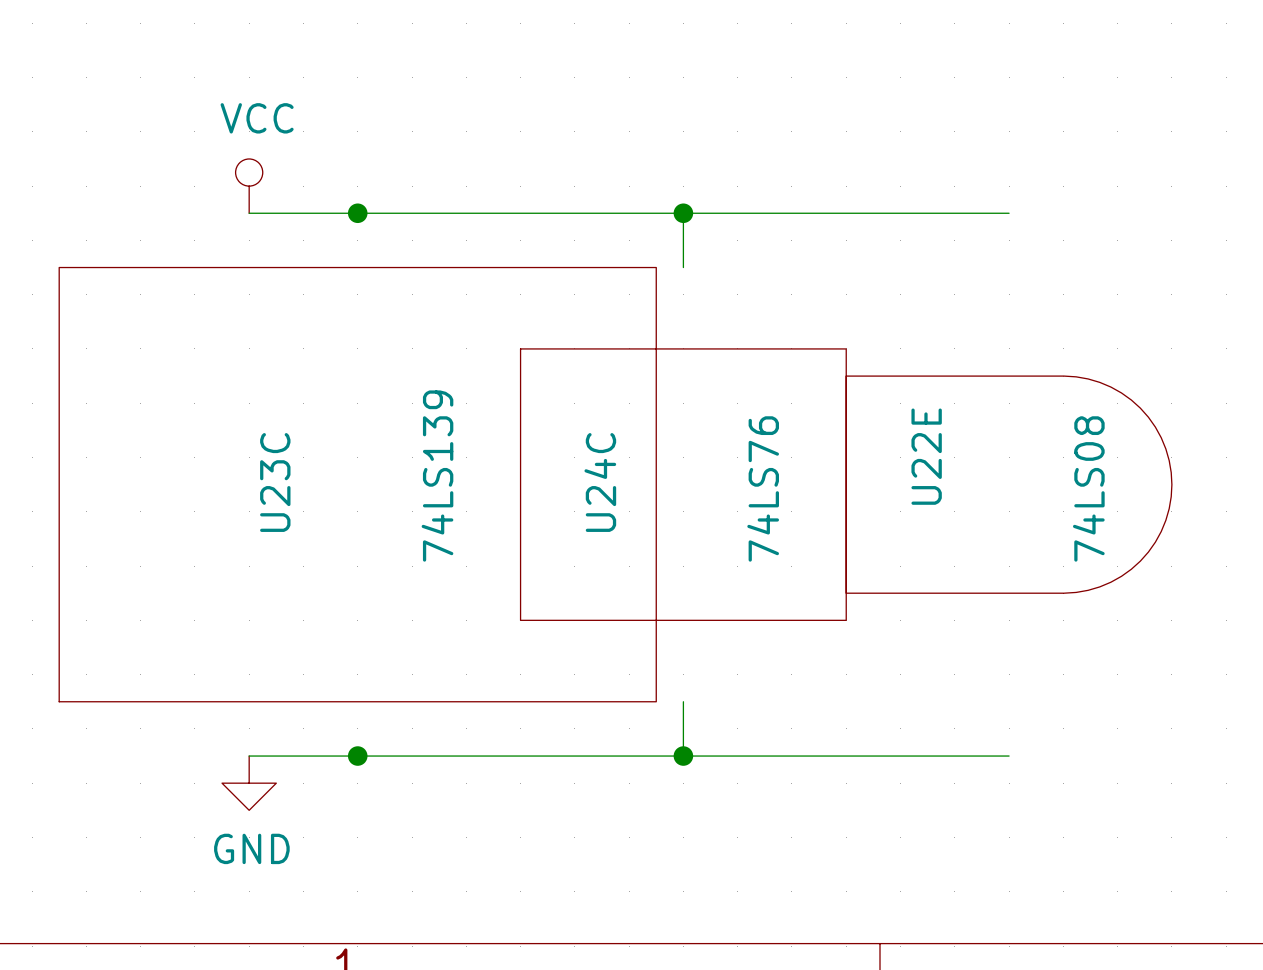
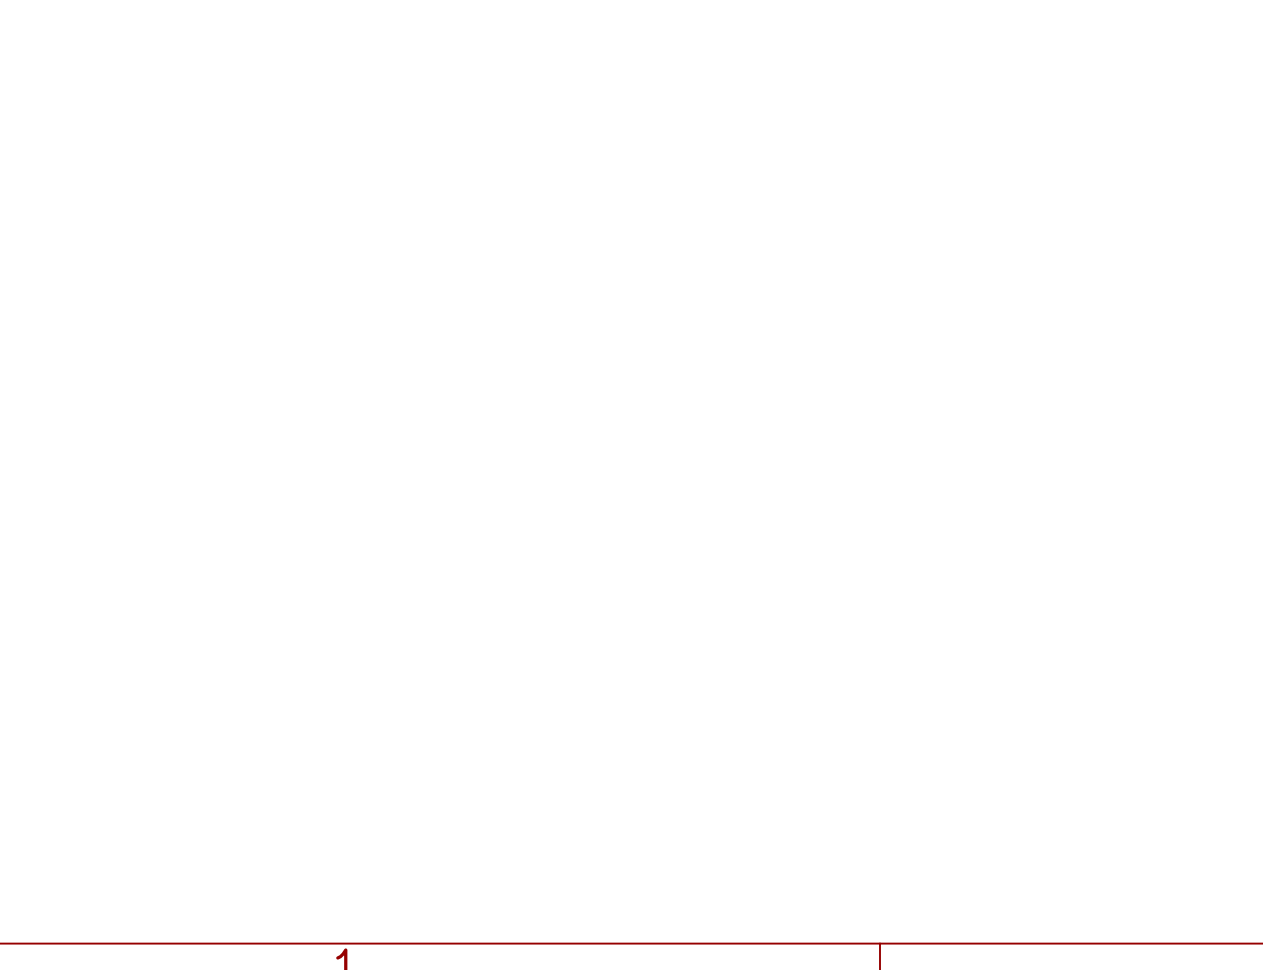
power symbol: VCC (249, 186) -> none
wire: (249, 213) (1009, 213) -> none
junction: (357, 213) -> none
wire: (683, 213) (683, 267) -> none
junction: (683, 213) -> none
U23C: 74LS139 (357, 484) -> none
U24C: 74LS76 (683, 484) -> none
U22E: 74LS08 (1009, 484) -> none
wire: (683, 701) (683, 756) -> none
wire: (249, 756) (1009, 756) -> none
junction: (357, 756) -> none
junction: (683, 756) -> none
power symbol: GND (249, 783) -> none

